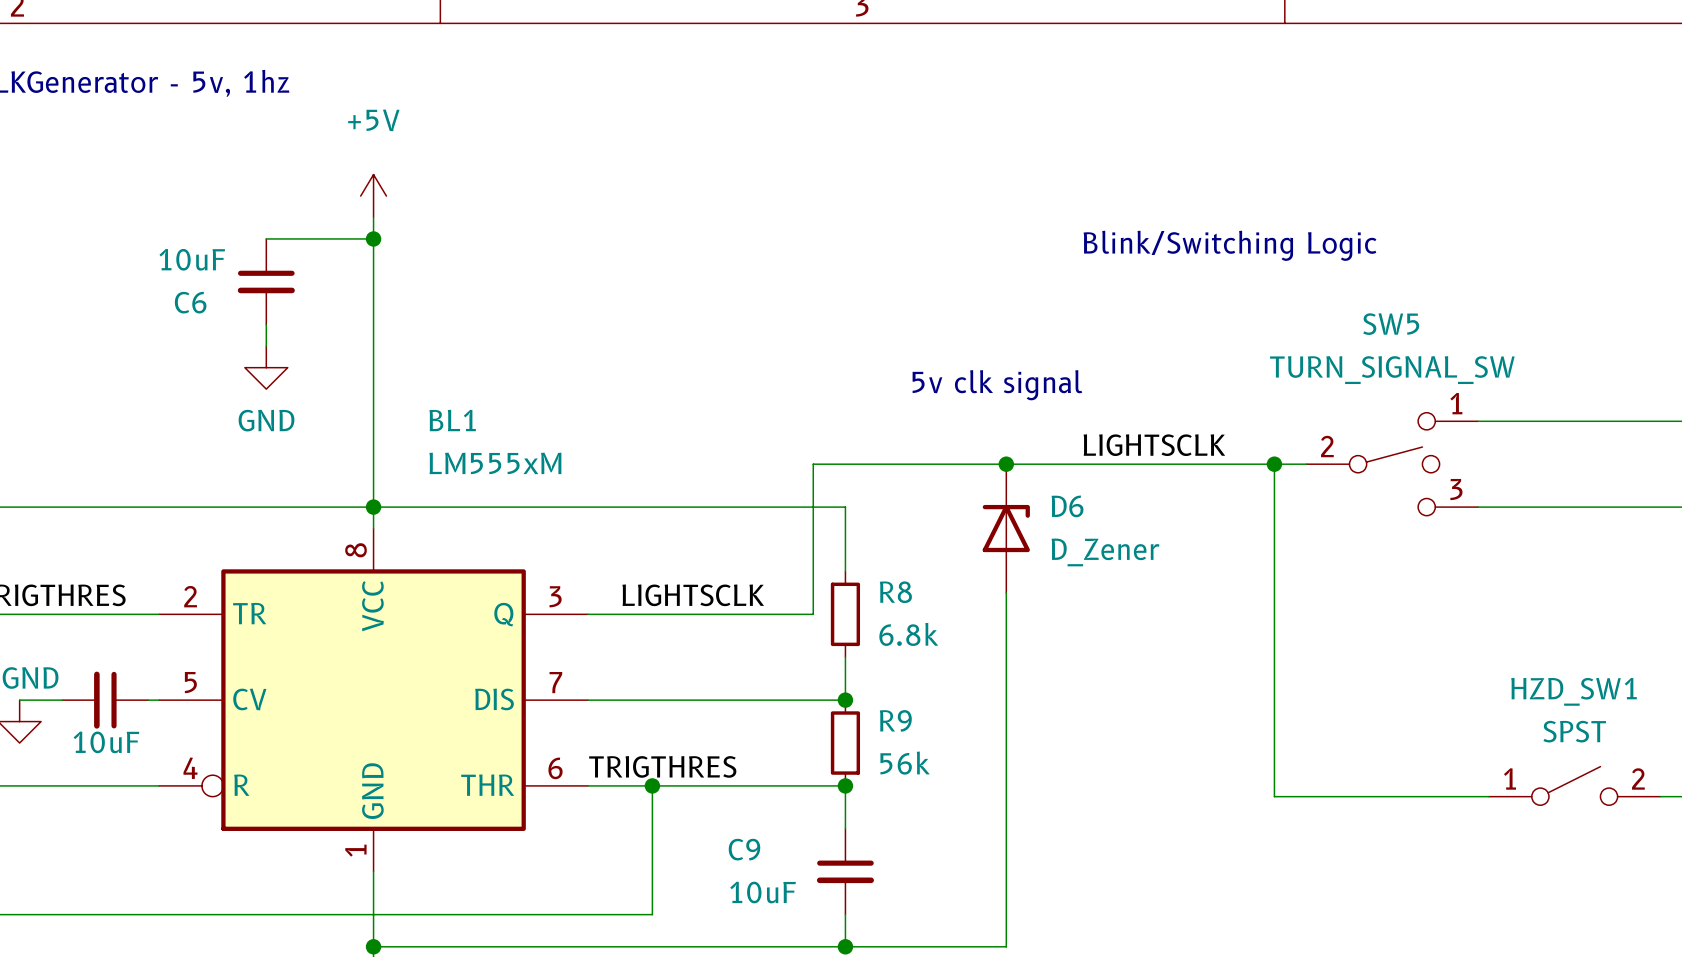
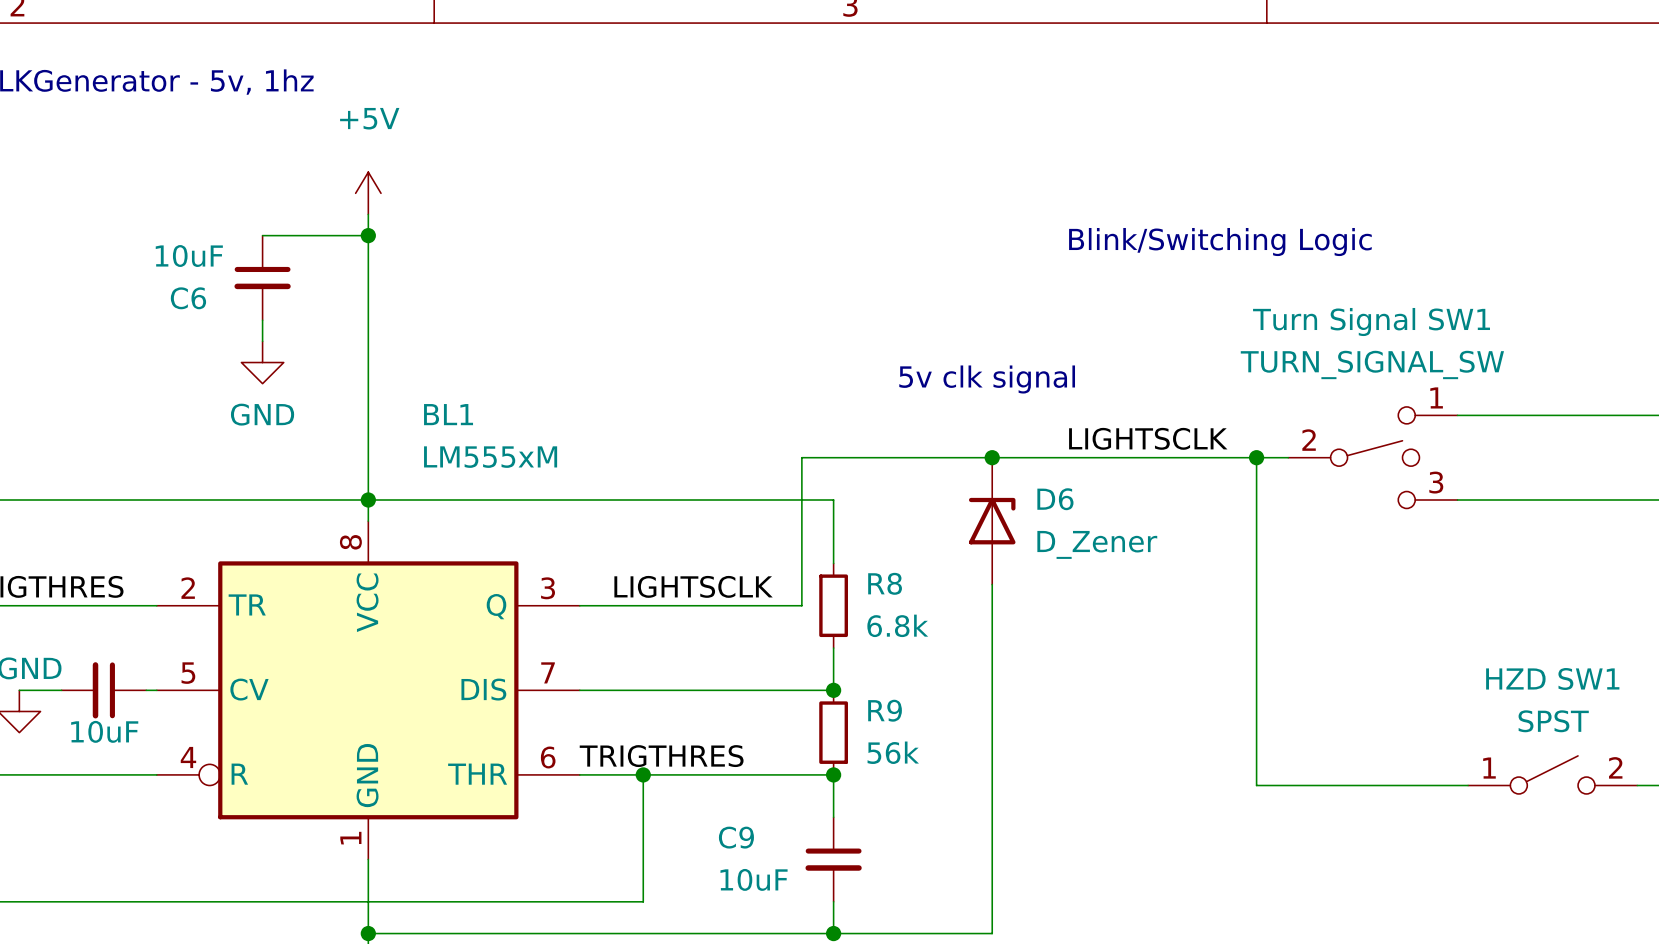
SW5 name: SW5 (1391, 324) -> Turn Signal SW1 (1371, 322)
HZD_SW1 name: HZD_SW1 (1574, 691) -> HZD SW1 (1552, 678)

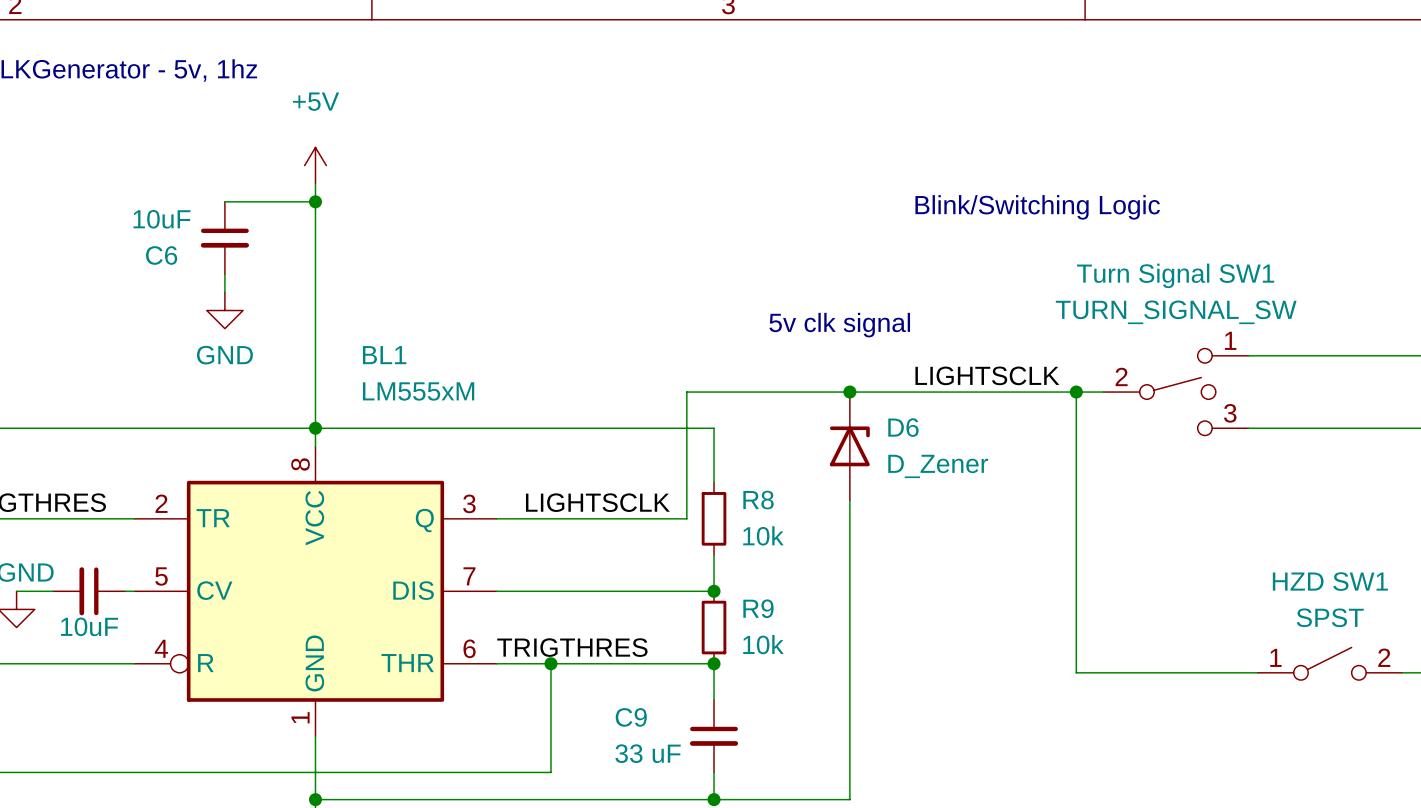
R8 value: 6.8k (897, 625) -> 10k (763, 535)
R9 value: 56k (893, 752) -> 10k (763, 644)
C9 value: 10uF (754, 879) -> 33 uF (648, 753)

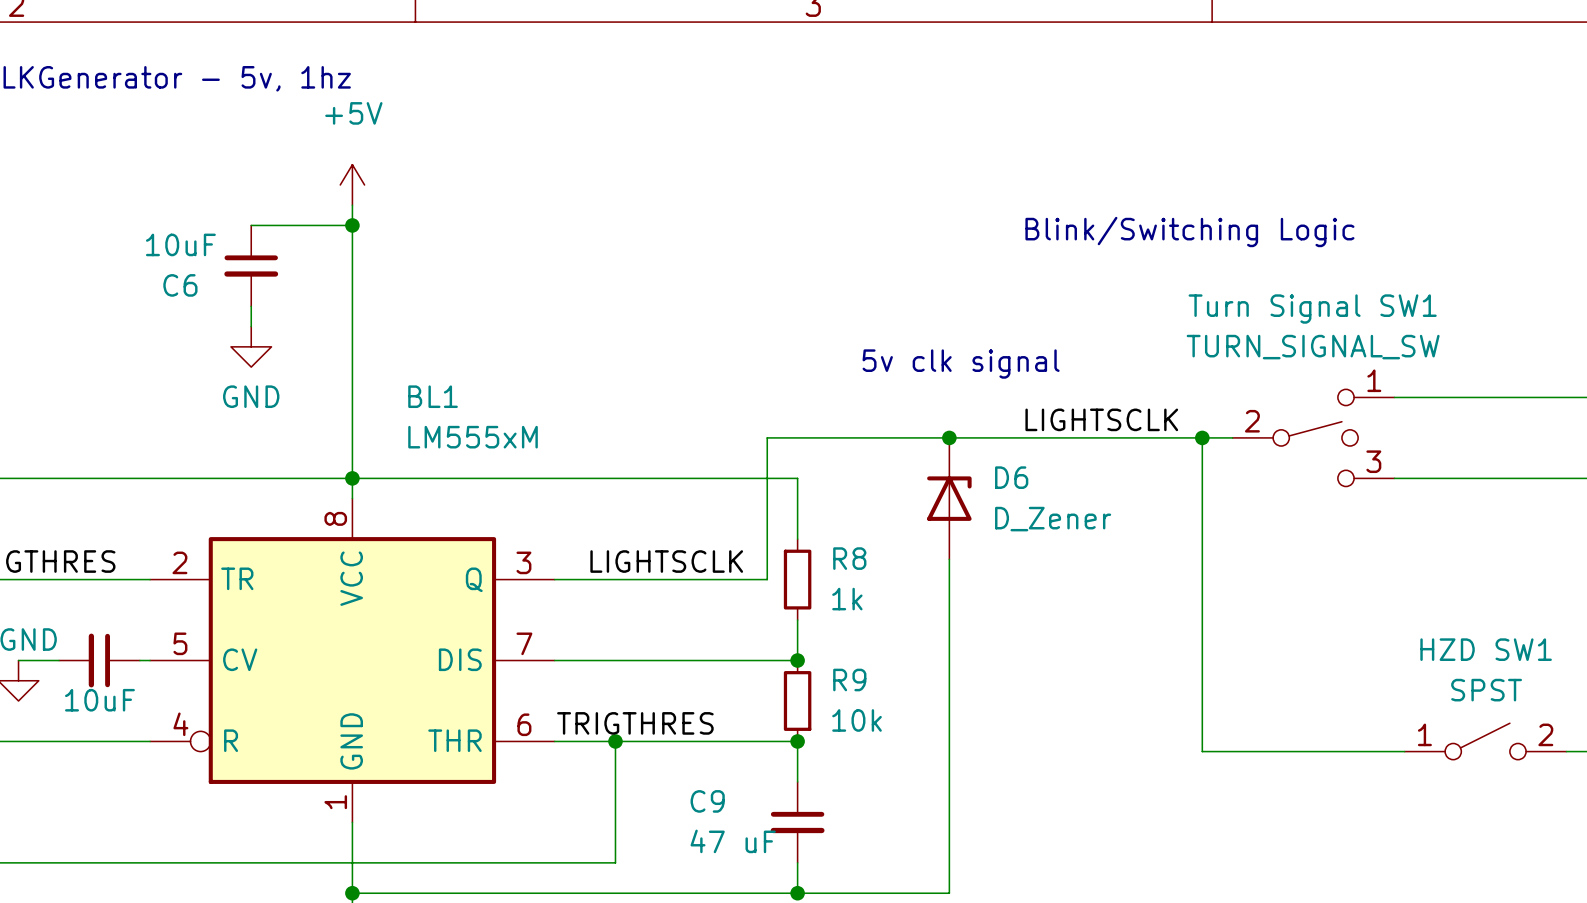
R8 value: 10k (763, 535) -> 1k (847, 599)
C9 value: 33 uF (648, 753) -> 47 uF (733, 841)

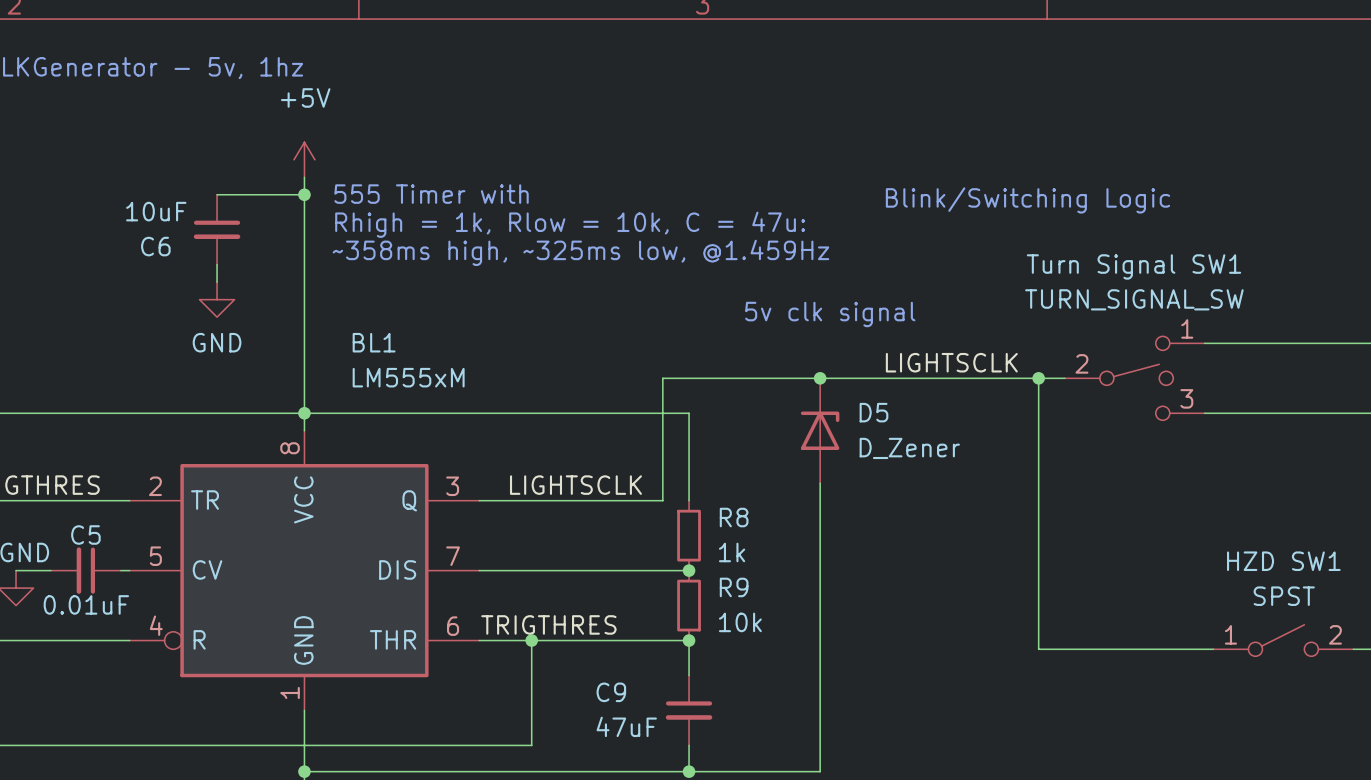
text: none -> 555 Timer with (431, 194)
text: none -> Rhigh = 1k, Rlow = 10k, C = 47u: (570, 224)
text: none -> ~358ms high, ~325ms low, @1.459Hz (580, 252)
D6 name: D6 (1011, 477) -> D5 (873, 412)
R8 position: (797, 579) -> (689, 535)
C5 name: none -> C5 (85, 535)
wire: (797, 620) (797, 660) -> (689, 465) (689, 500)
C5 value: 10uF (99, 700) -> 0.01uF (86, 604)
C9 value: 47 uF (733, 841) -> 47uF (626, 726)

